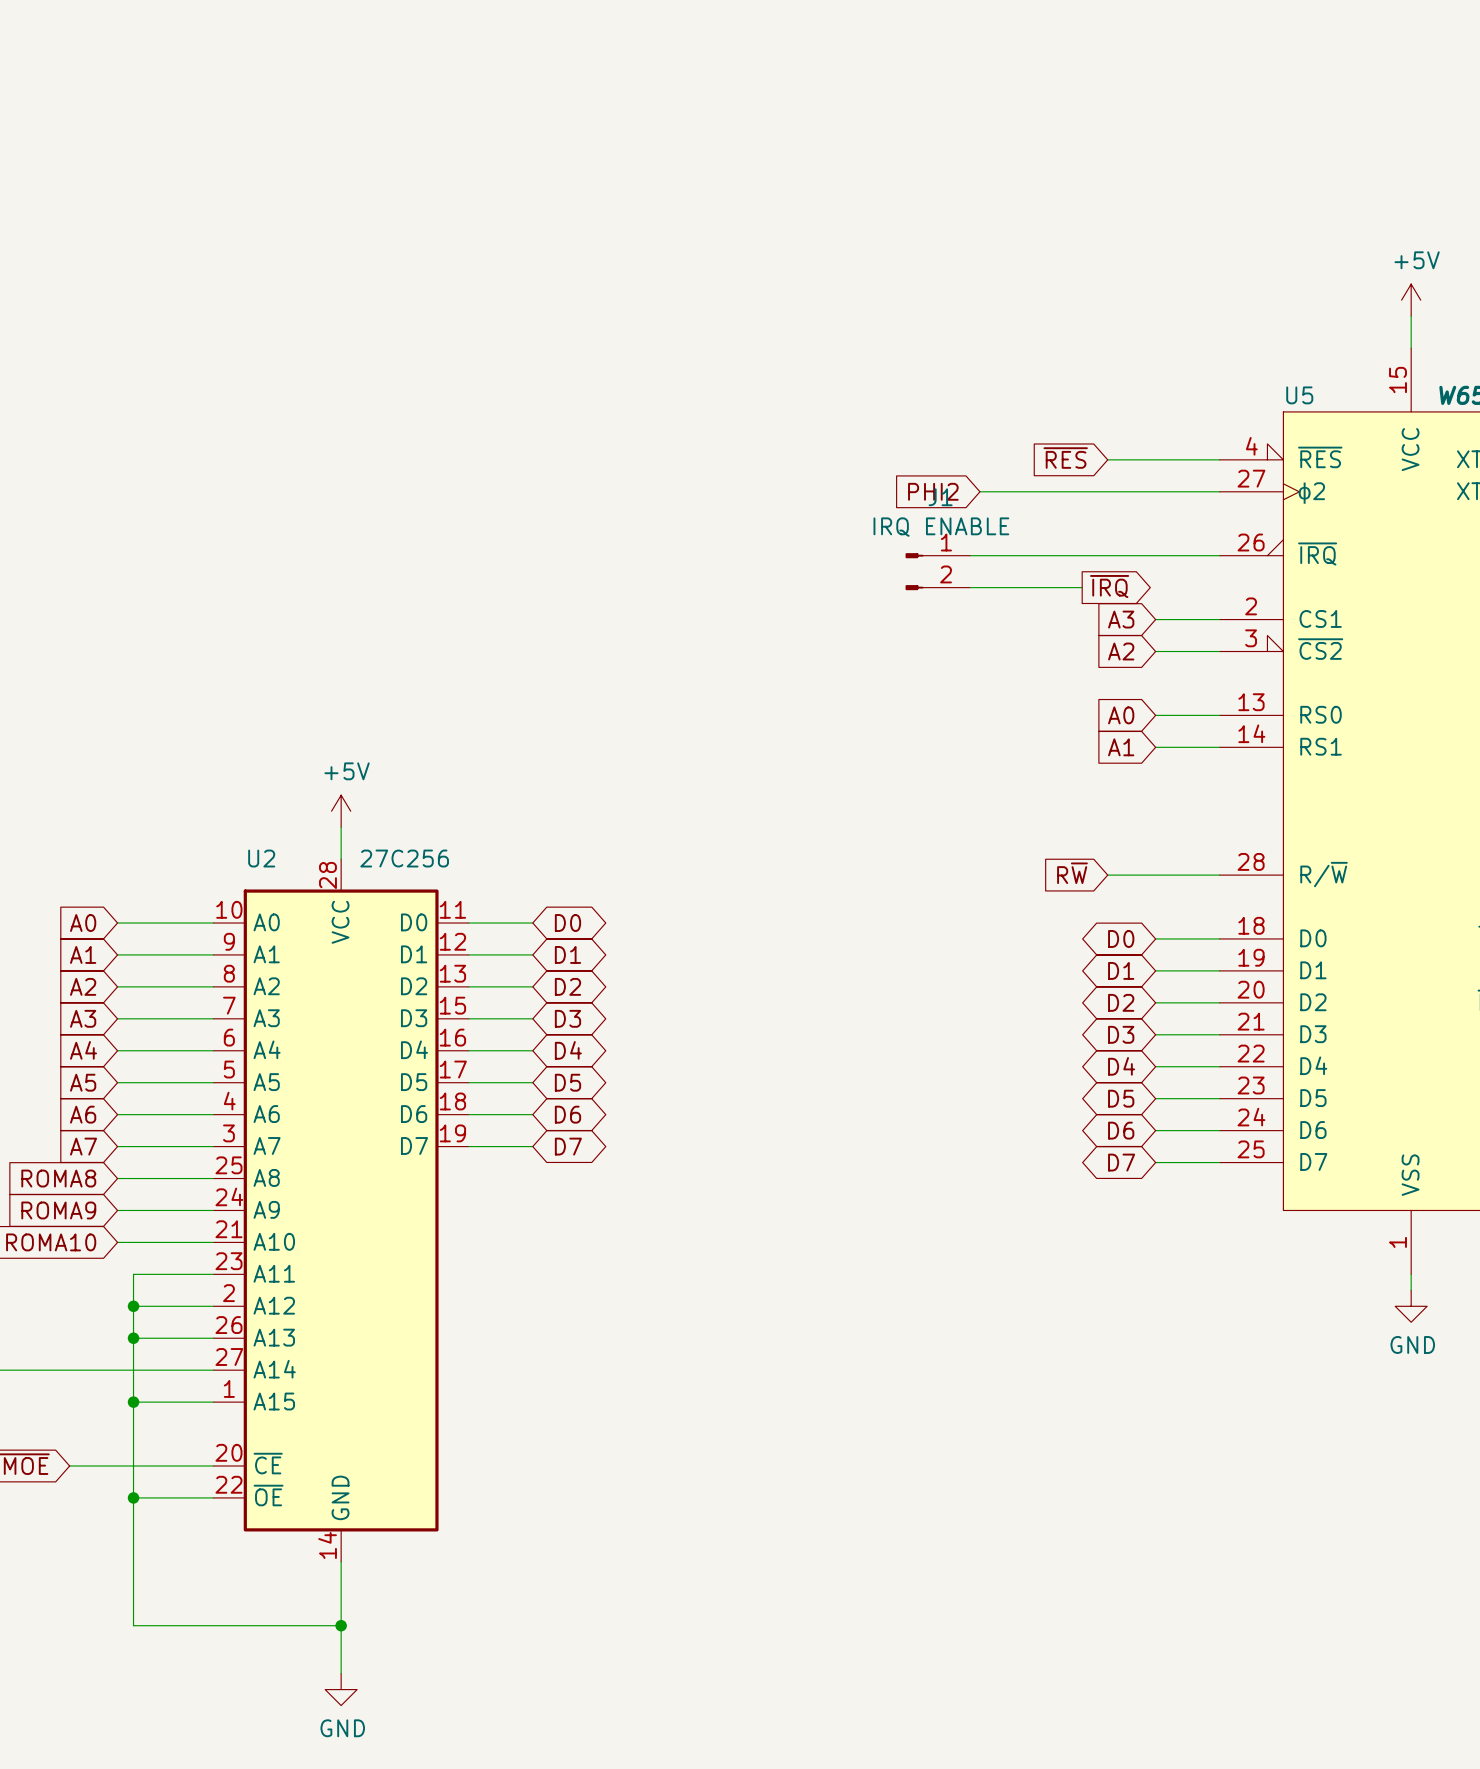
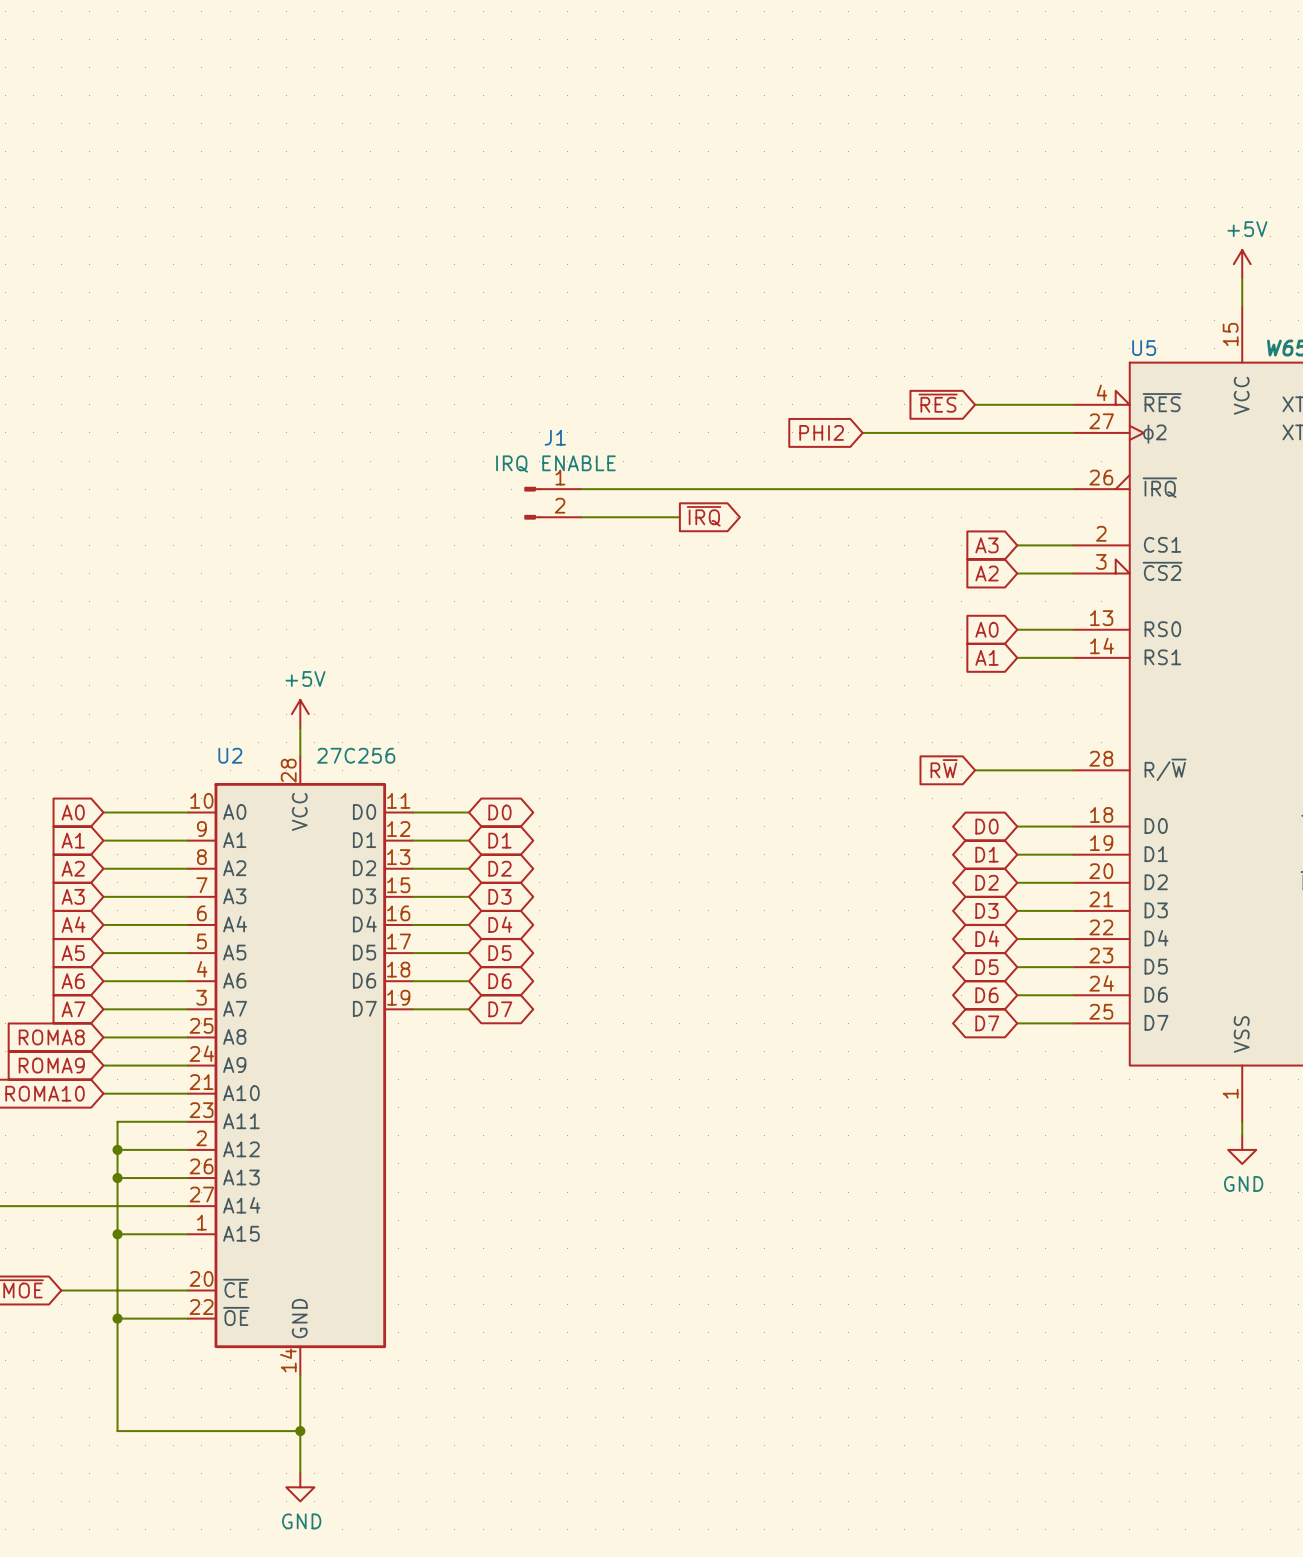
wire: none -> (581, 489) (854, 489)
J1 position: (937, 571) -> (552, 503)
global label position: ~{IRQ} (1109, 586) -> ~{IRQ} (704, 516)
wire: (970, 587) (1082, 587) -> (581, 517) (679, 517)

